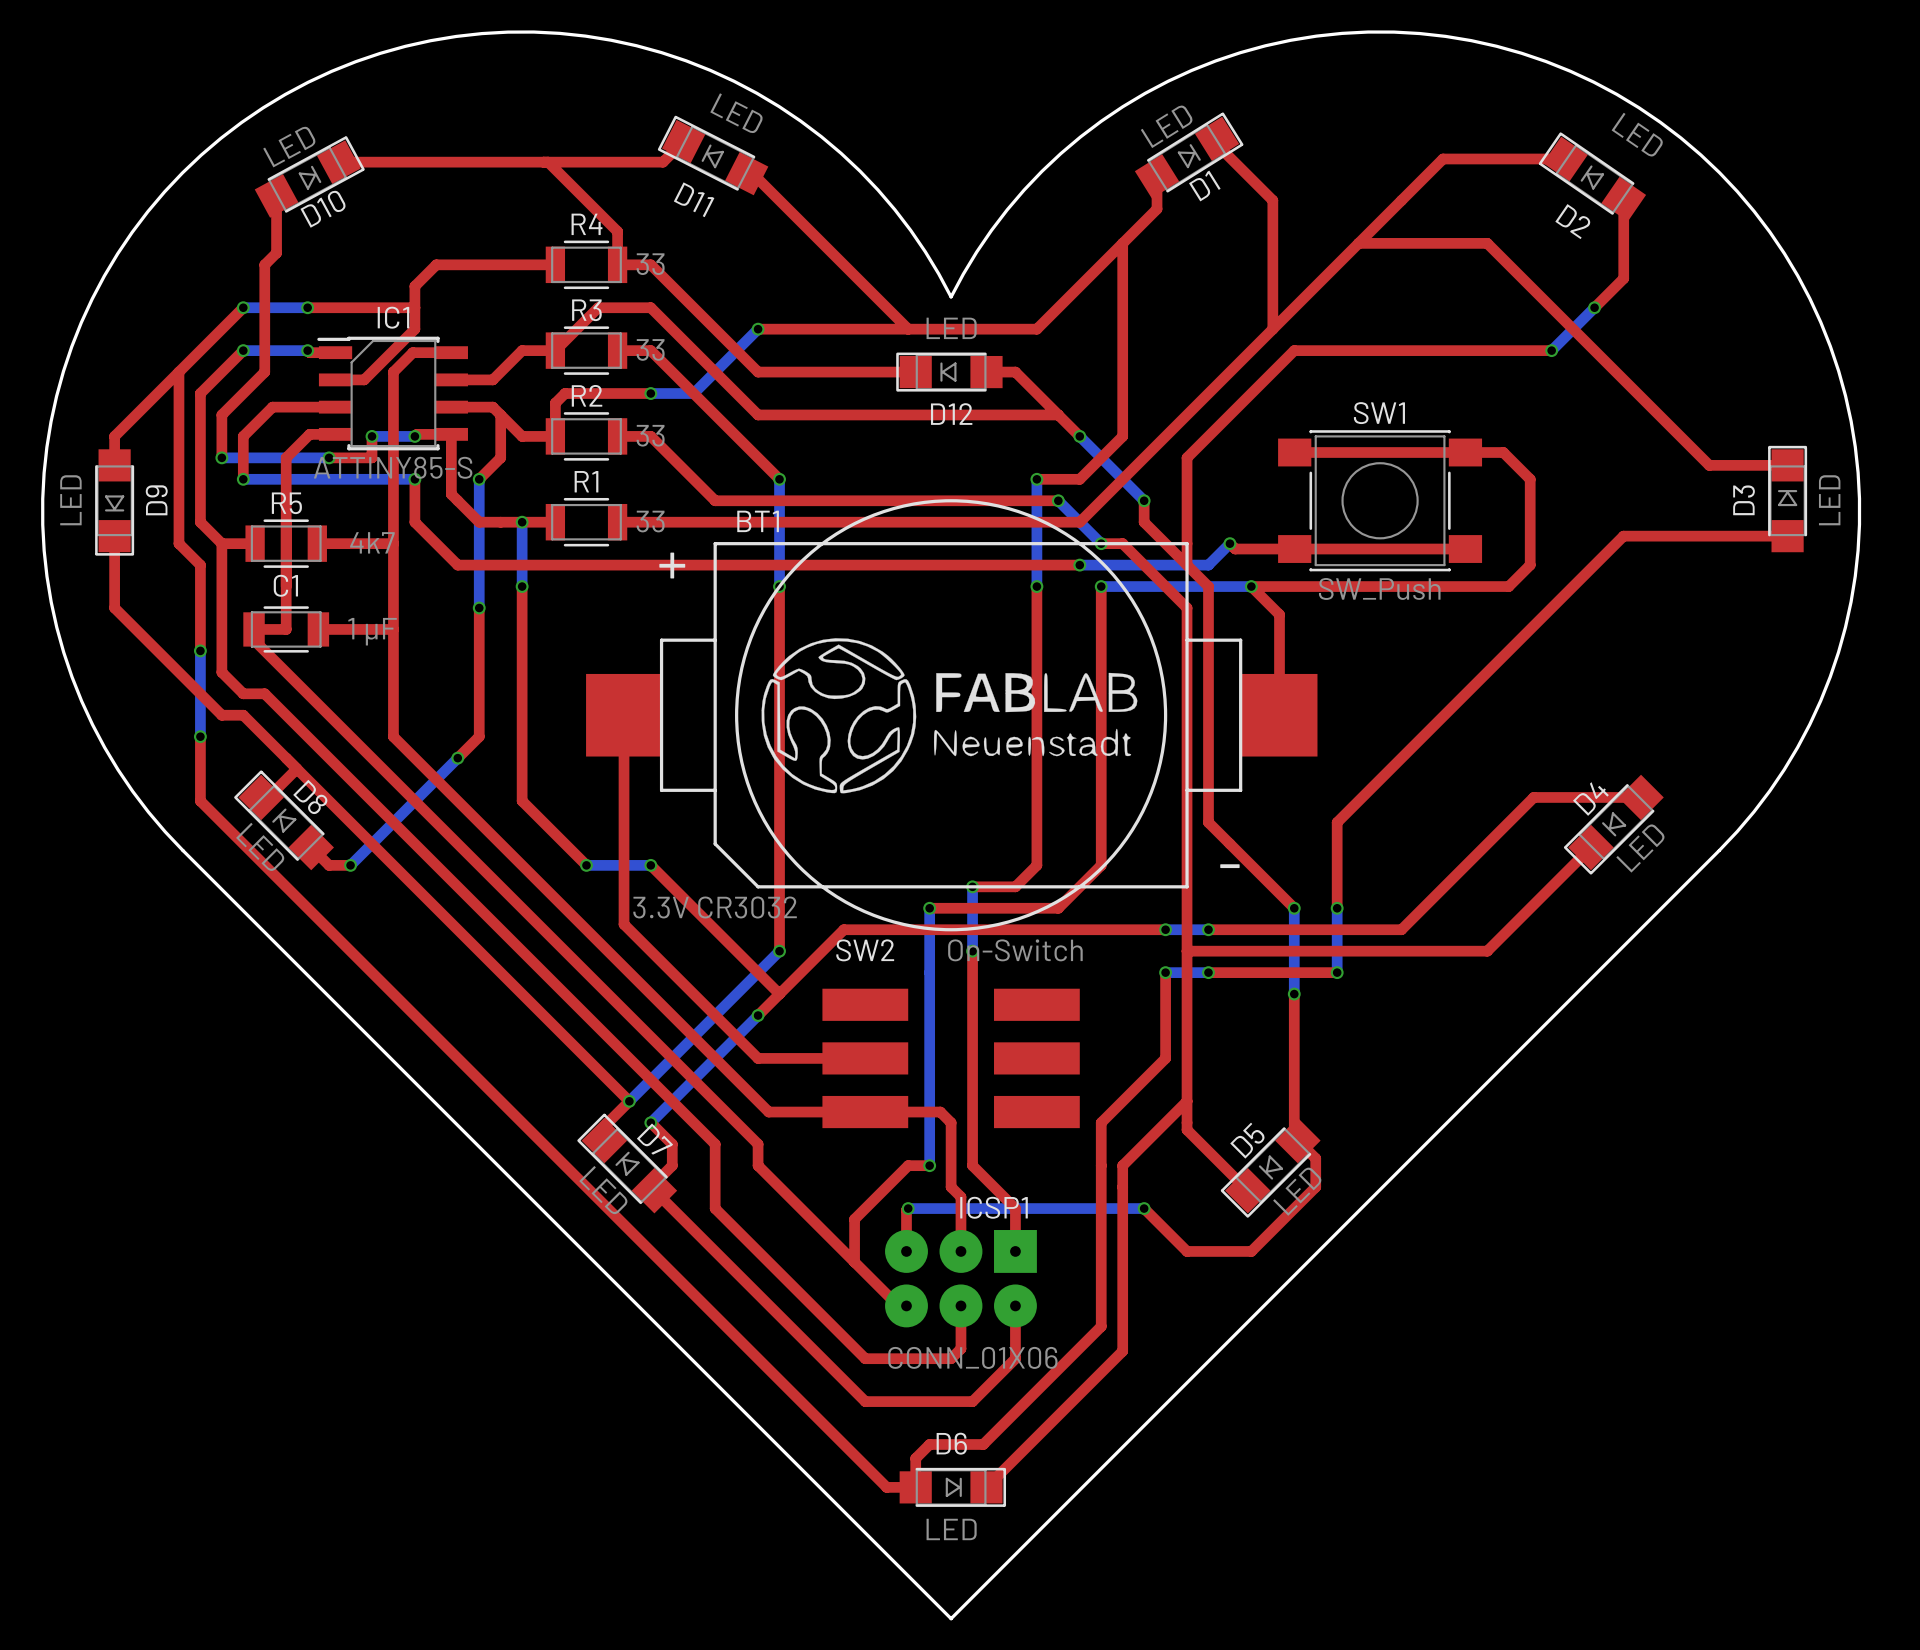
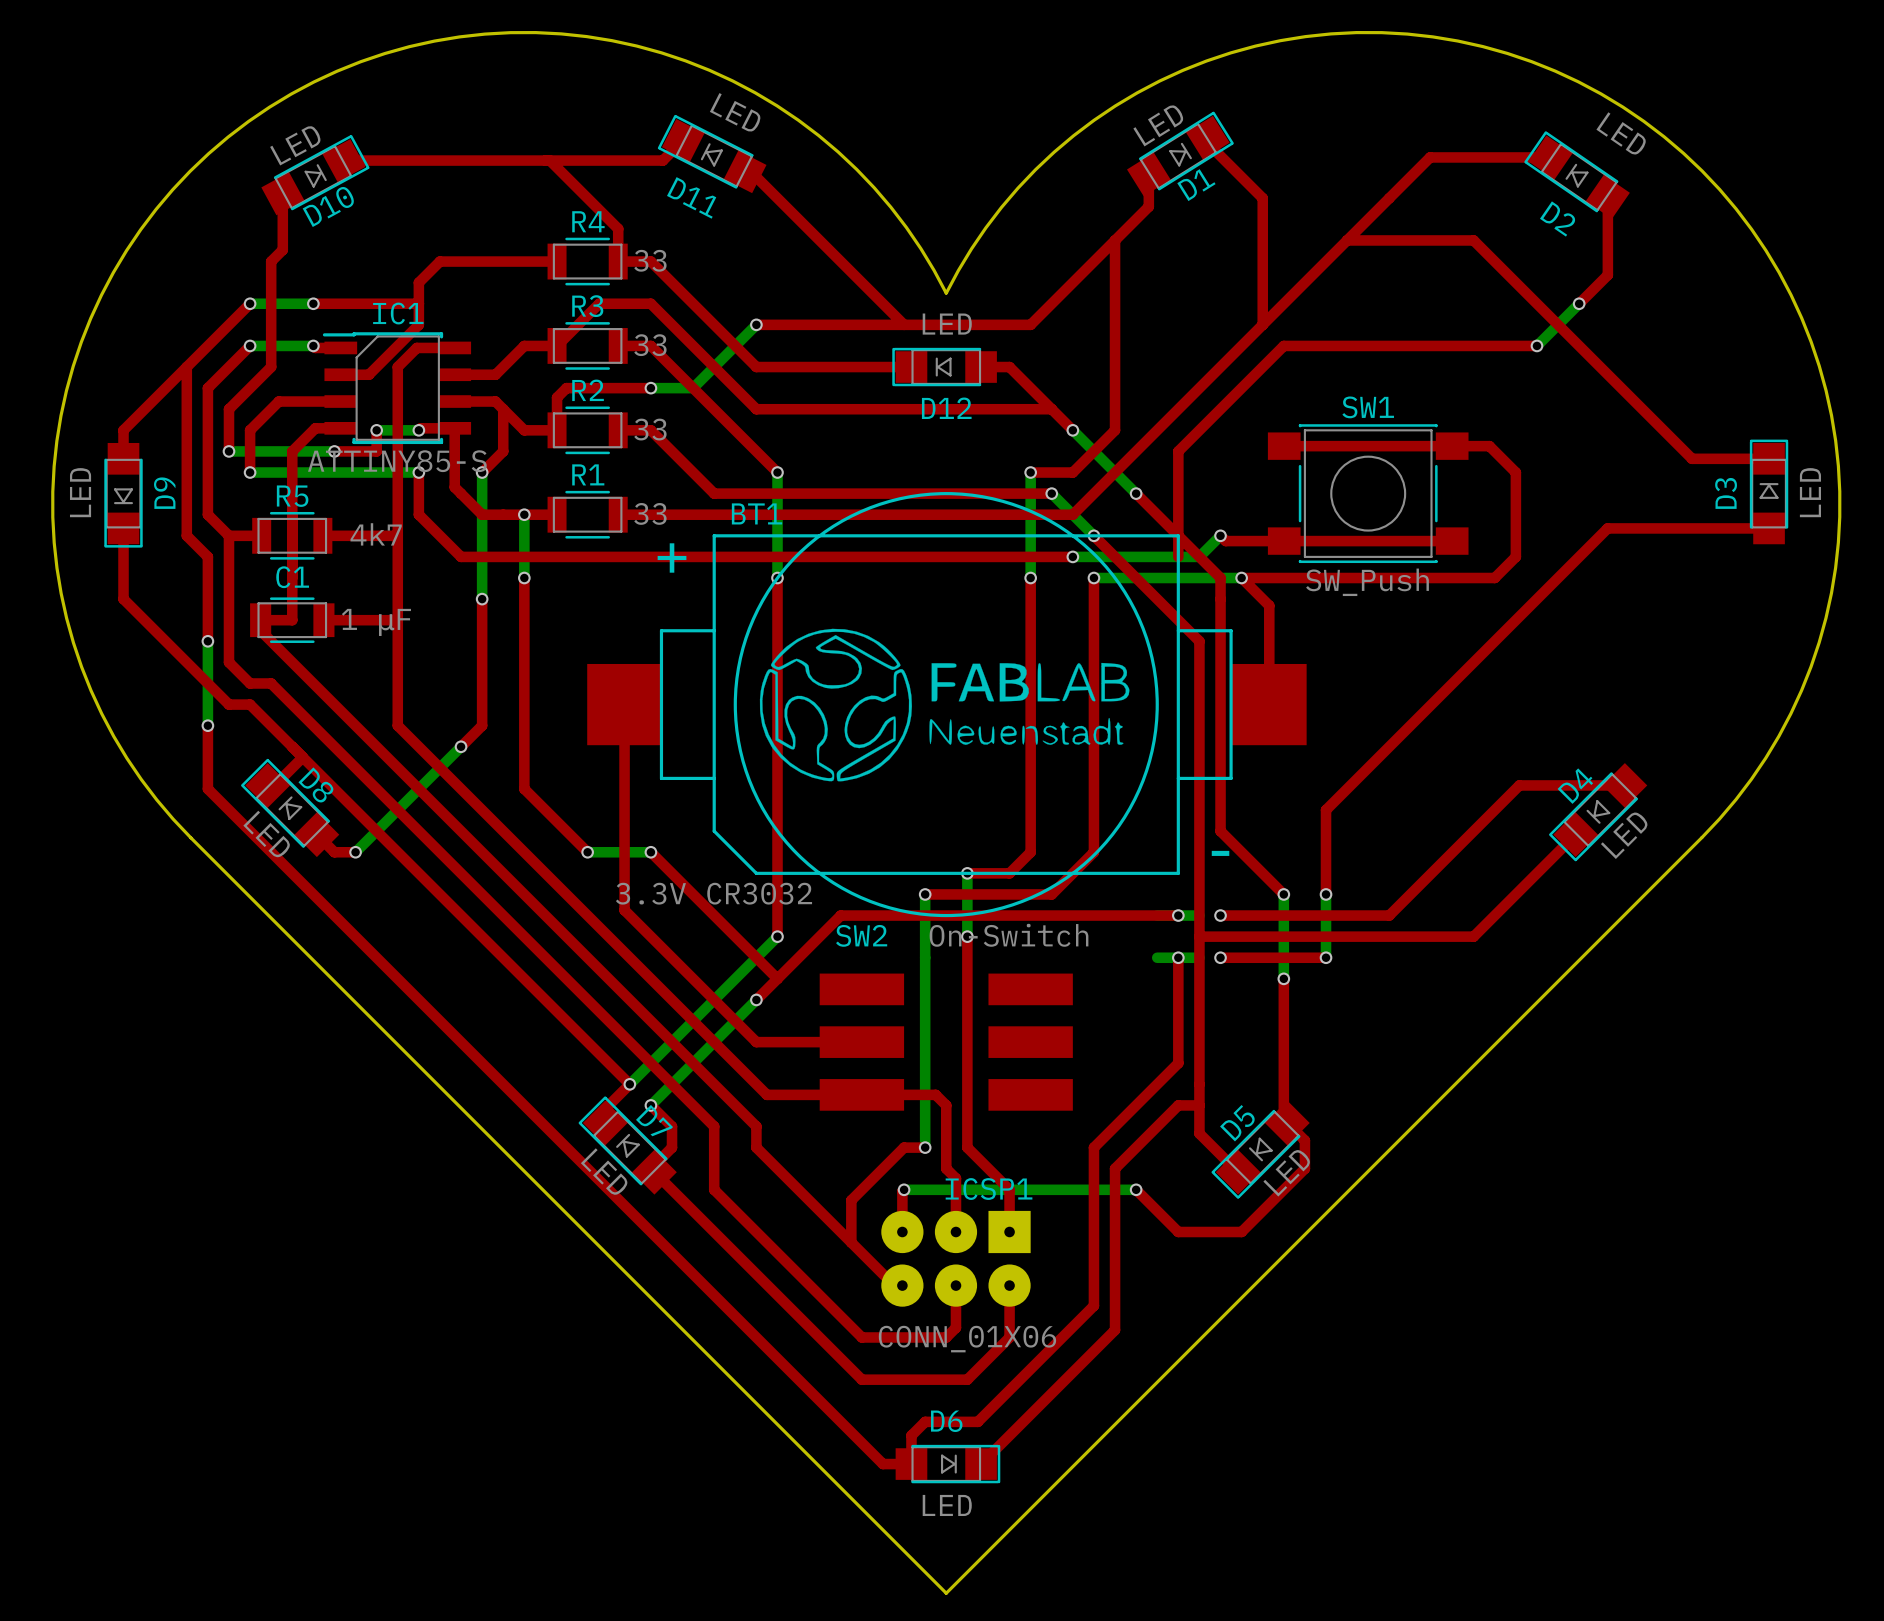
top track: (1144, 500) (1144, 522) (1208, 586) (1208, 650) -> (1093, 535) (1199, 641)
top track: none -> (1136, 493) (1220, 578) (1220, 831)
top track: (1101, 543) (1122, 543) (1187, 608) (1187, 972) -> none
top track: (1208, 822) (1229, 843) -> (1199, 810) (1199, 1133)
via: (1165, 929) -> none
via: none -> (1178, 915)
top track: (1208, 929) (1229, 929) -> none
via: (1208, 929) -> none
via: none -> (1220, 915)
top track: (1187, 951) (1208, 951) -> (1157, 915) (1178, 915)
top track: (1165, 972) (1165, 1058) (1101, 1122) (1101, 1165) -> none
via: (1165, 972) -> none
via: none -> (1178, 957)
top track: (1208, 972) (1229, 972) -> none
via: (1208, 972) -> none
via: none -> (1220, 957)
top track: (1187, 1079) (1187, 1129) (1208, 1151) -> (1178, 1063) (1093, 1147)
top track: (1187, 1101) (1122, 1165) (1122, 1187) -> (1199, 1105) (1178, 1105) (1115, 1168)

